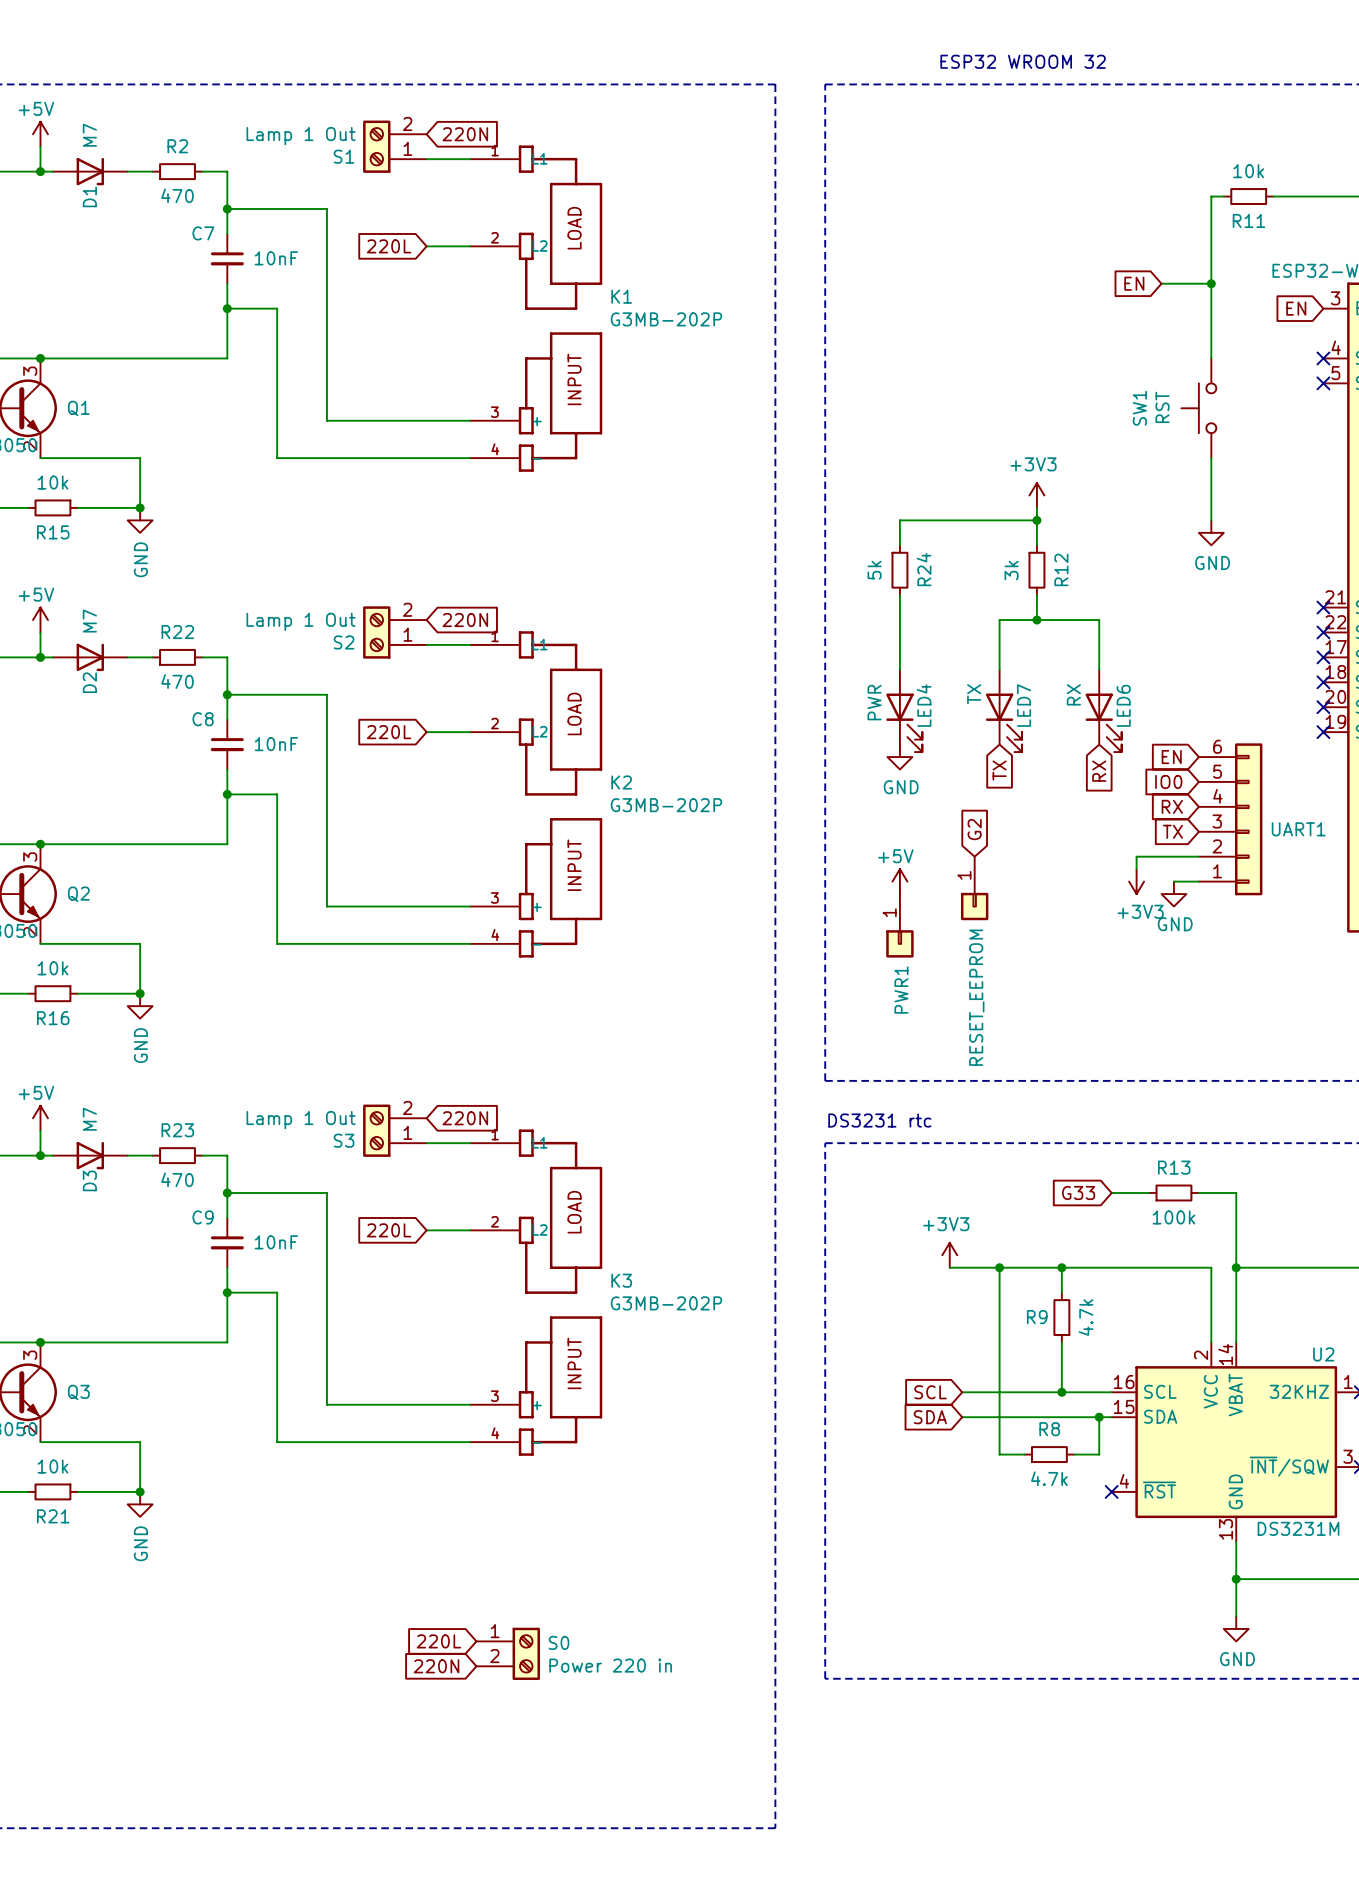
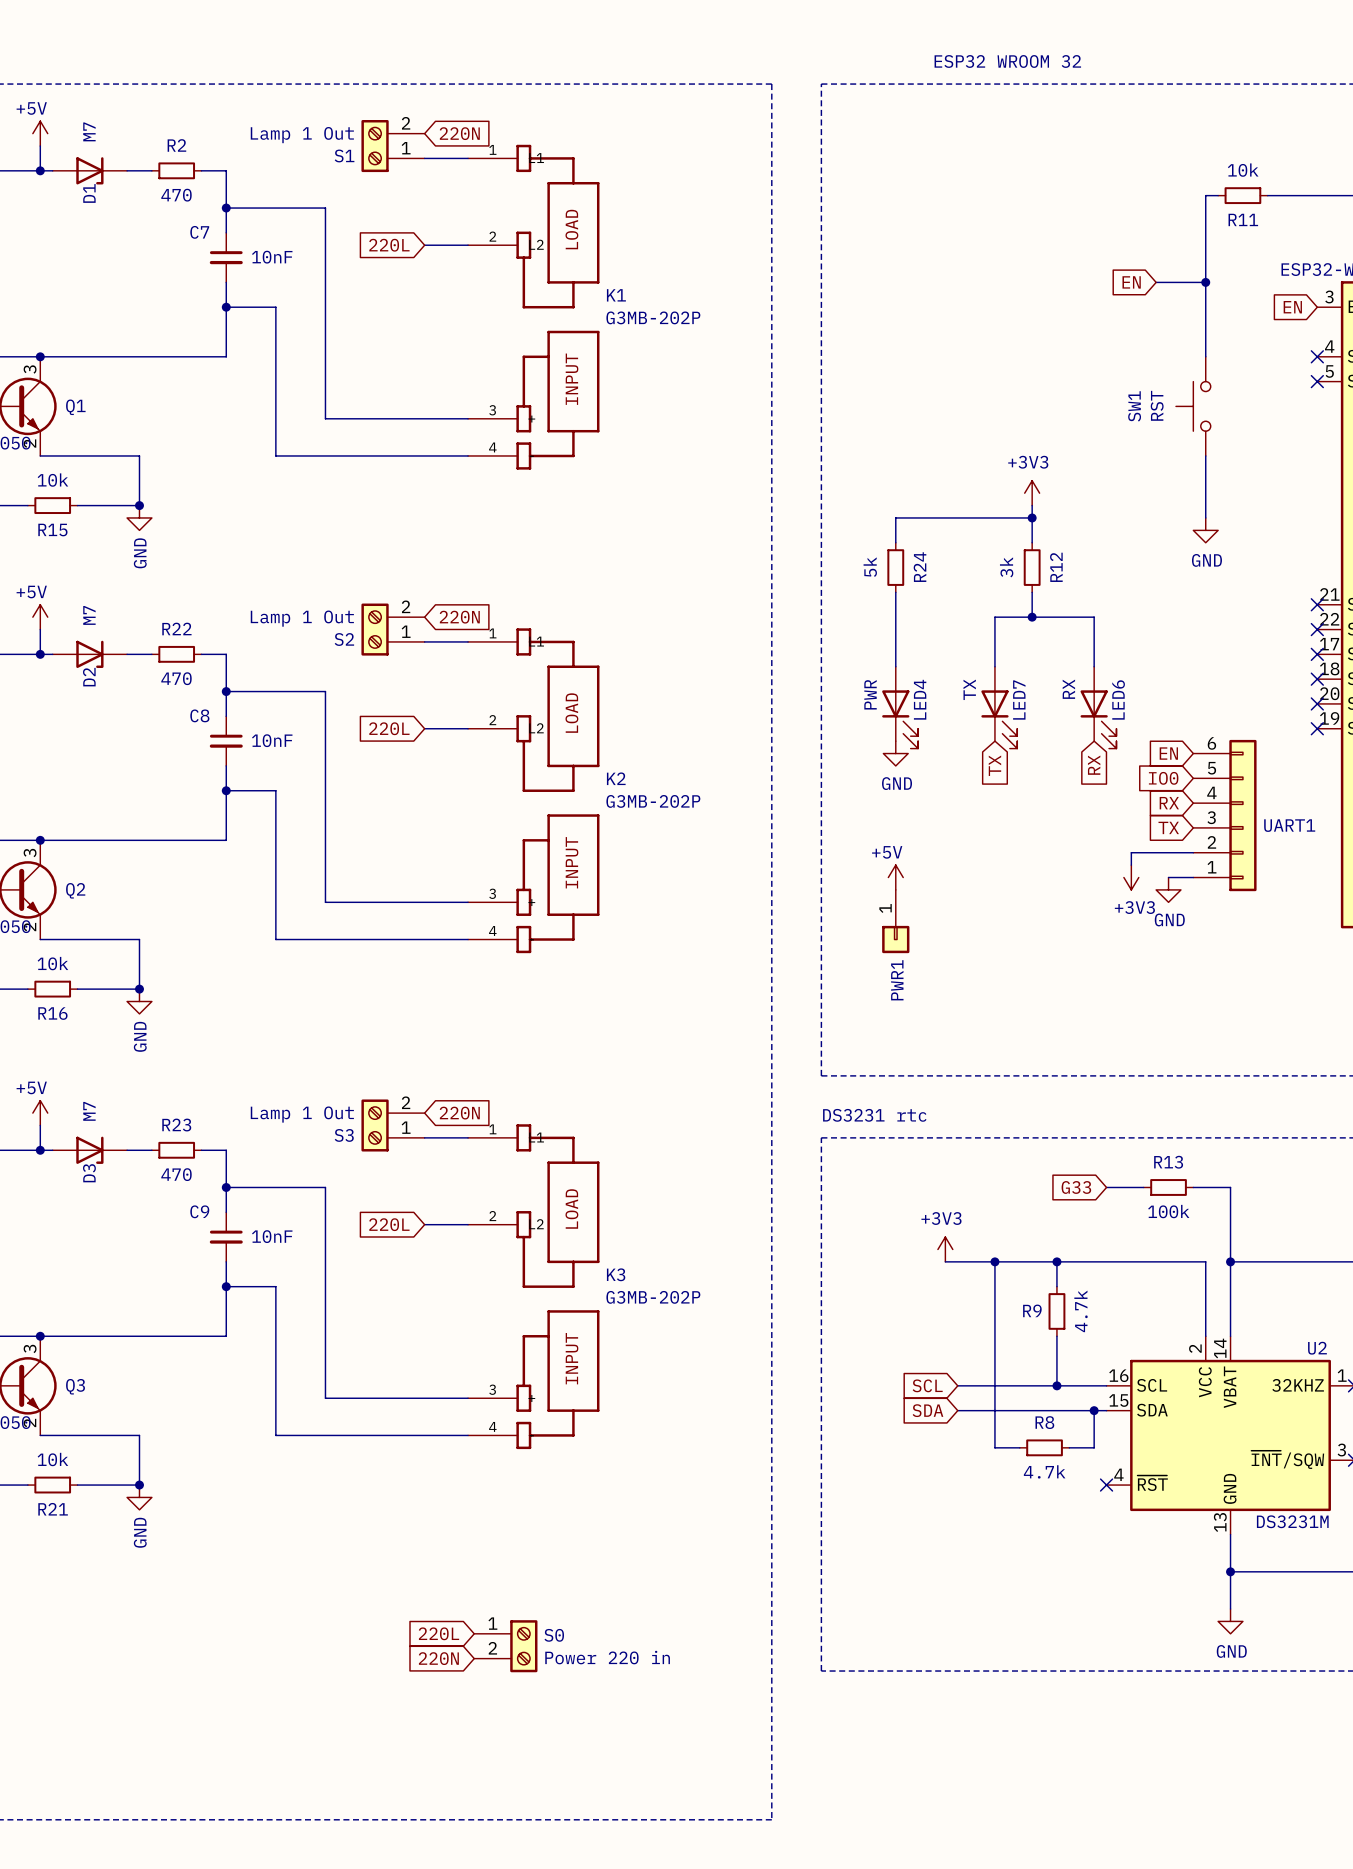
global label: G2 (974, 829) -> none
RESET_EEPROM: (974, 888) -> none

